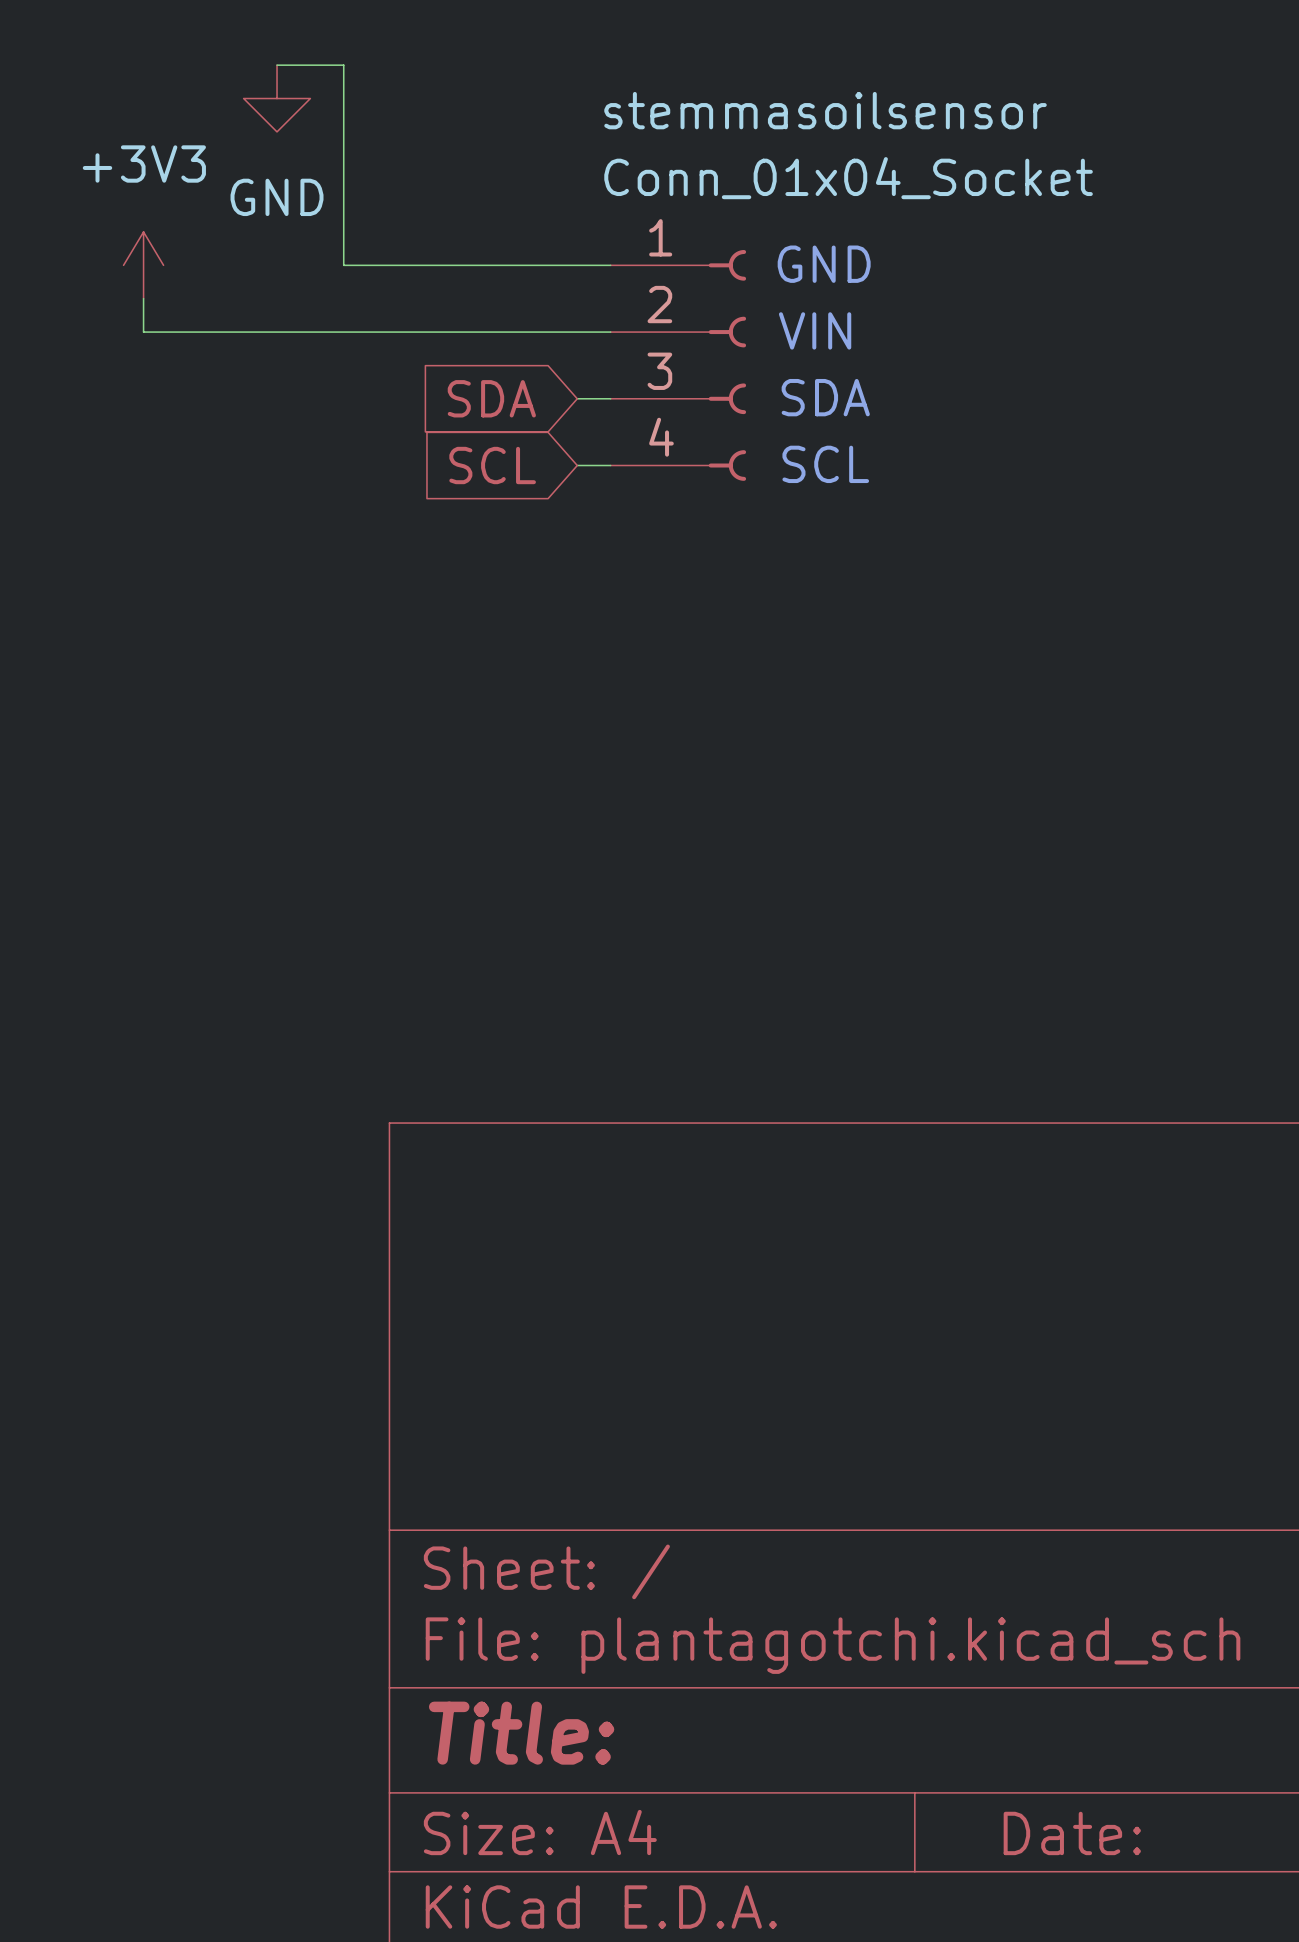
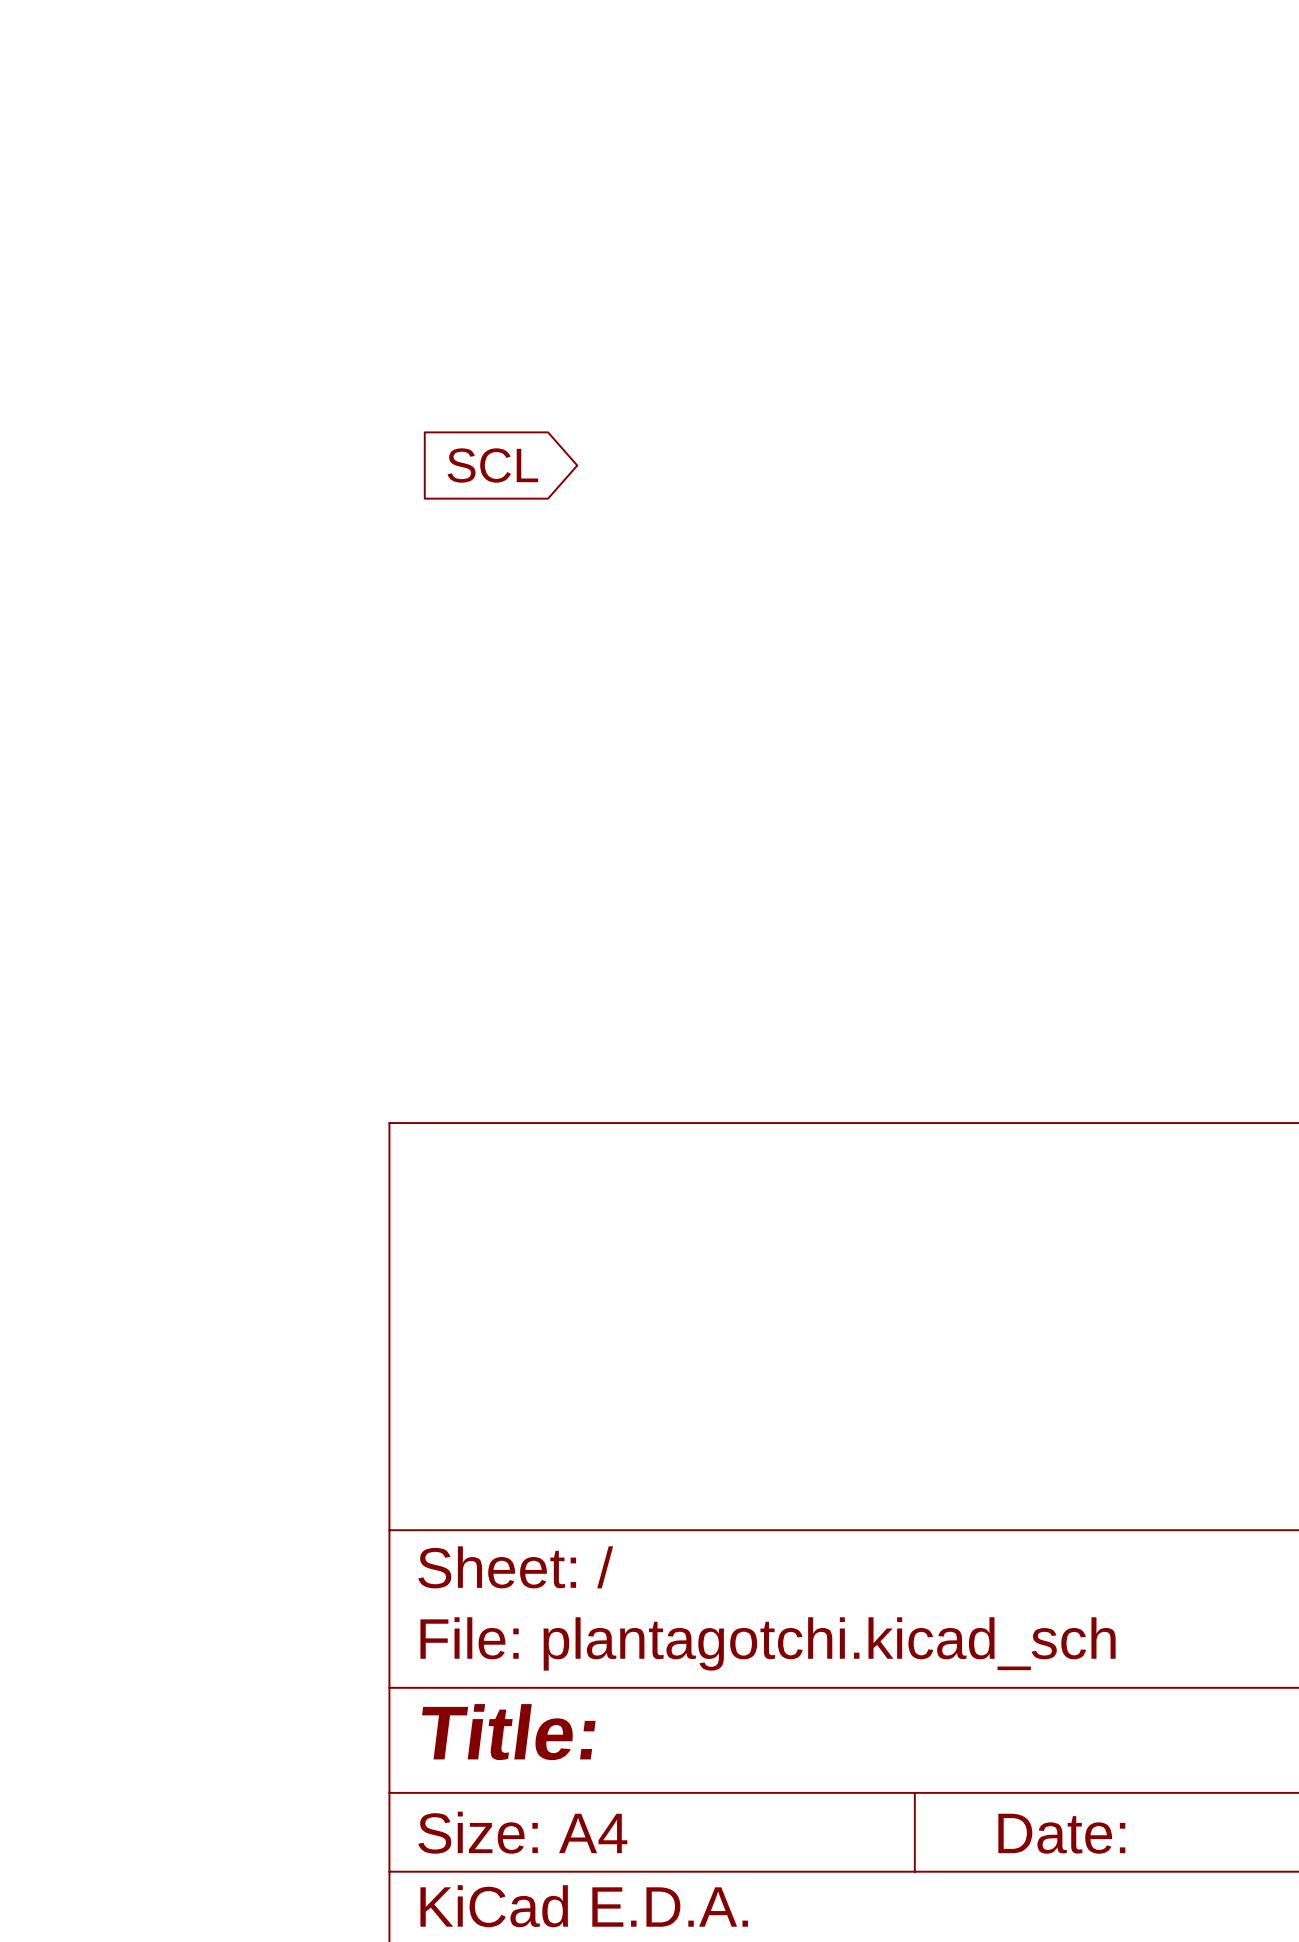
wire: (277, 65) (343, 65) (343, 265) (610, 265) -> none
power symbol: GND (277, 98) -> none
text: GND (824, 264) -> none
power symbol: +3V3 (143, 265) -> none
wire: (143, 298) (143, 332) (610, 332) -> none
text: VIN (815, 330) -> none
stemmasoilsensor: Conn_01x04_Socket (678, 365) -> none
text: SDA (825, 397) -> none
global label: SDA (491, 398) -> none
wire: (577, 398) (610, 398) -> none
text: SCL (825, 464) -> none
wire: (577, 465) (610, 465) -> none

